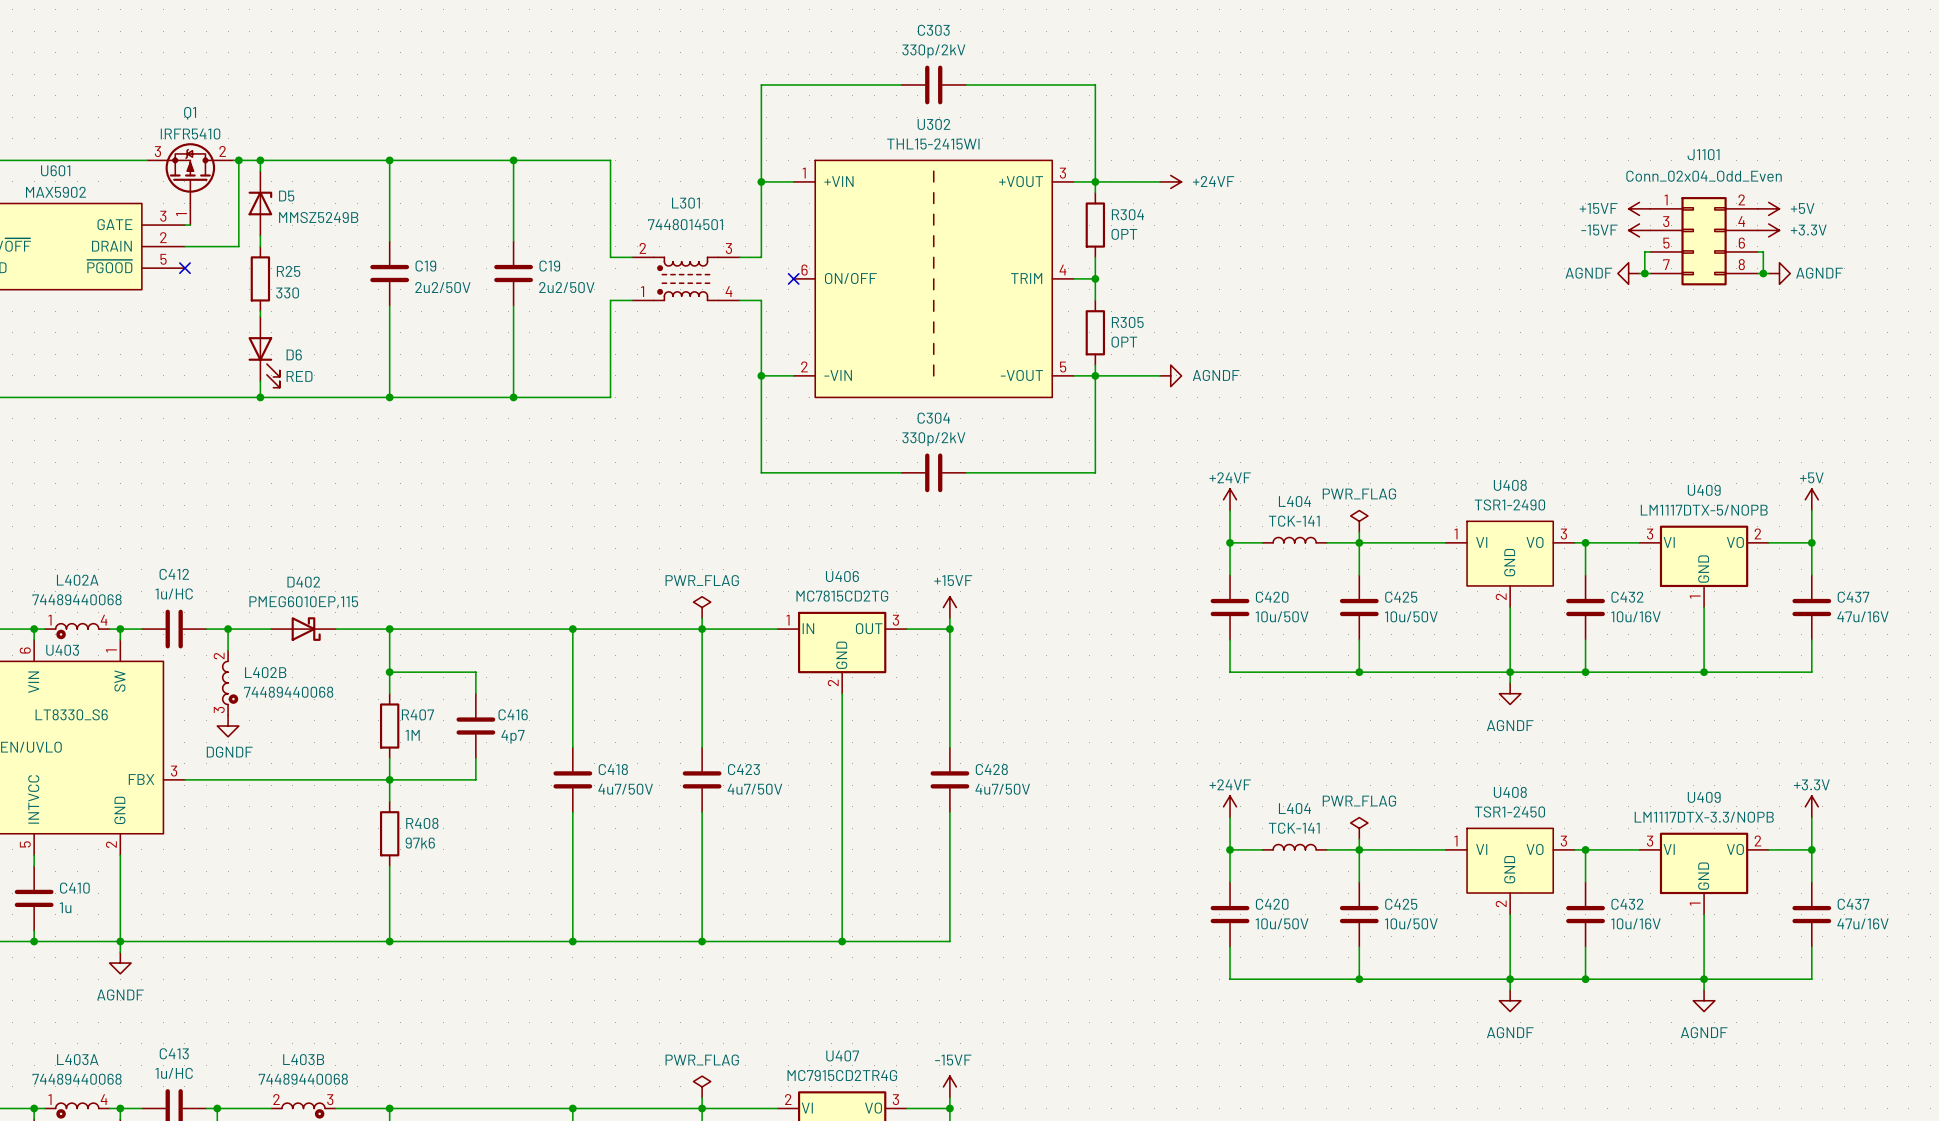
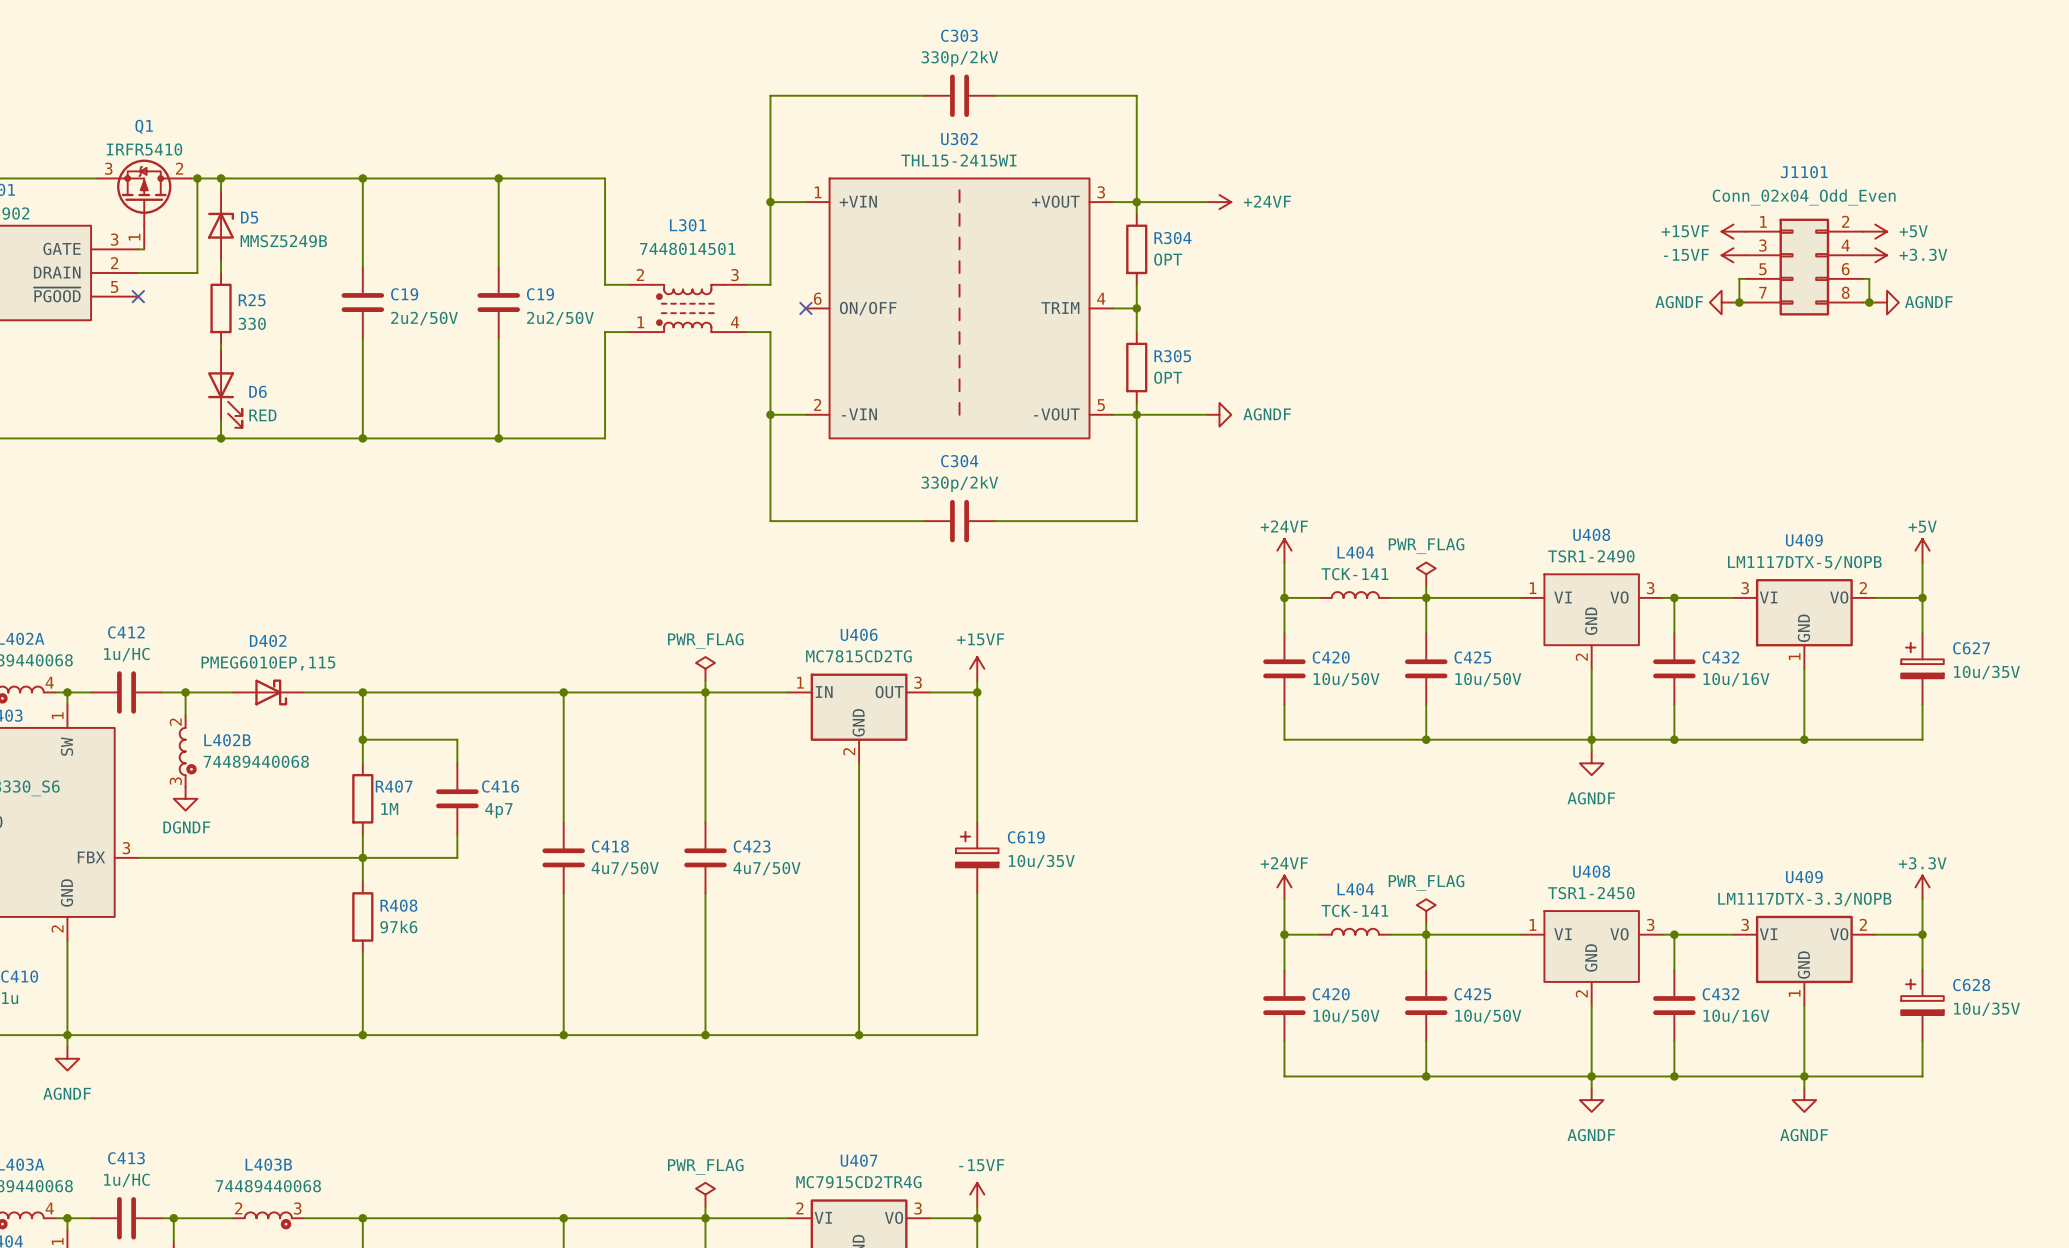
C437: 47u/16V (1811, 607) -> none
C627: none -> 10u/35V (1922, 668)
C428: 4u7/50V (949, 779) -> none
C619: none -> 10u/35V (977, 857)
C437: 47u/16V (1811, 914) -> none
C628: none -> 10u/35V (1922, 1005)

